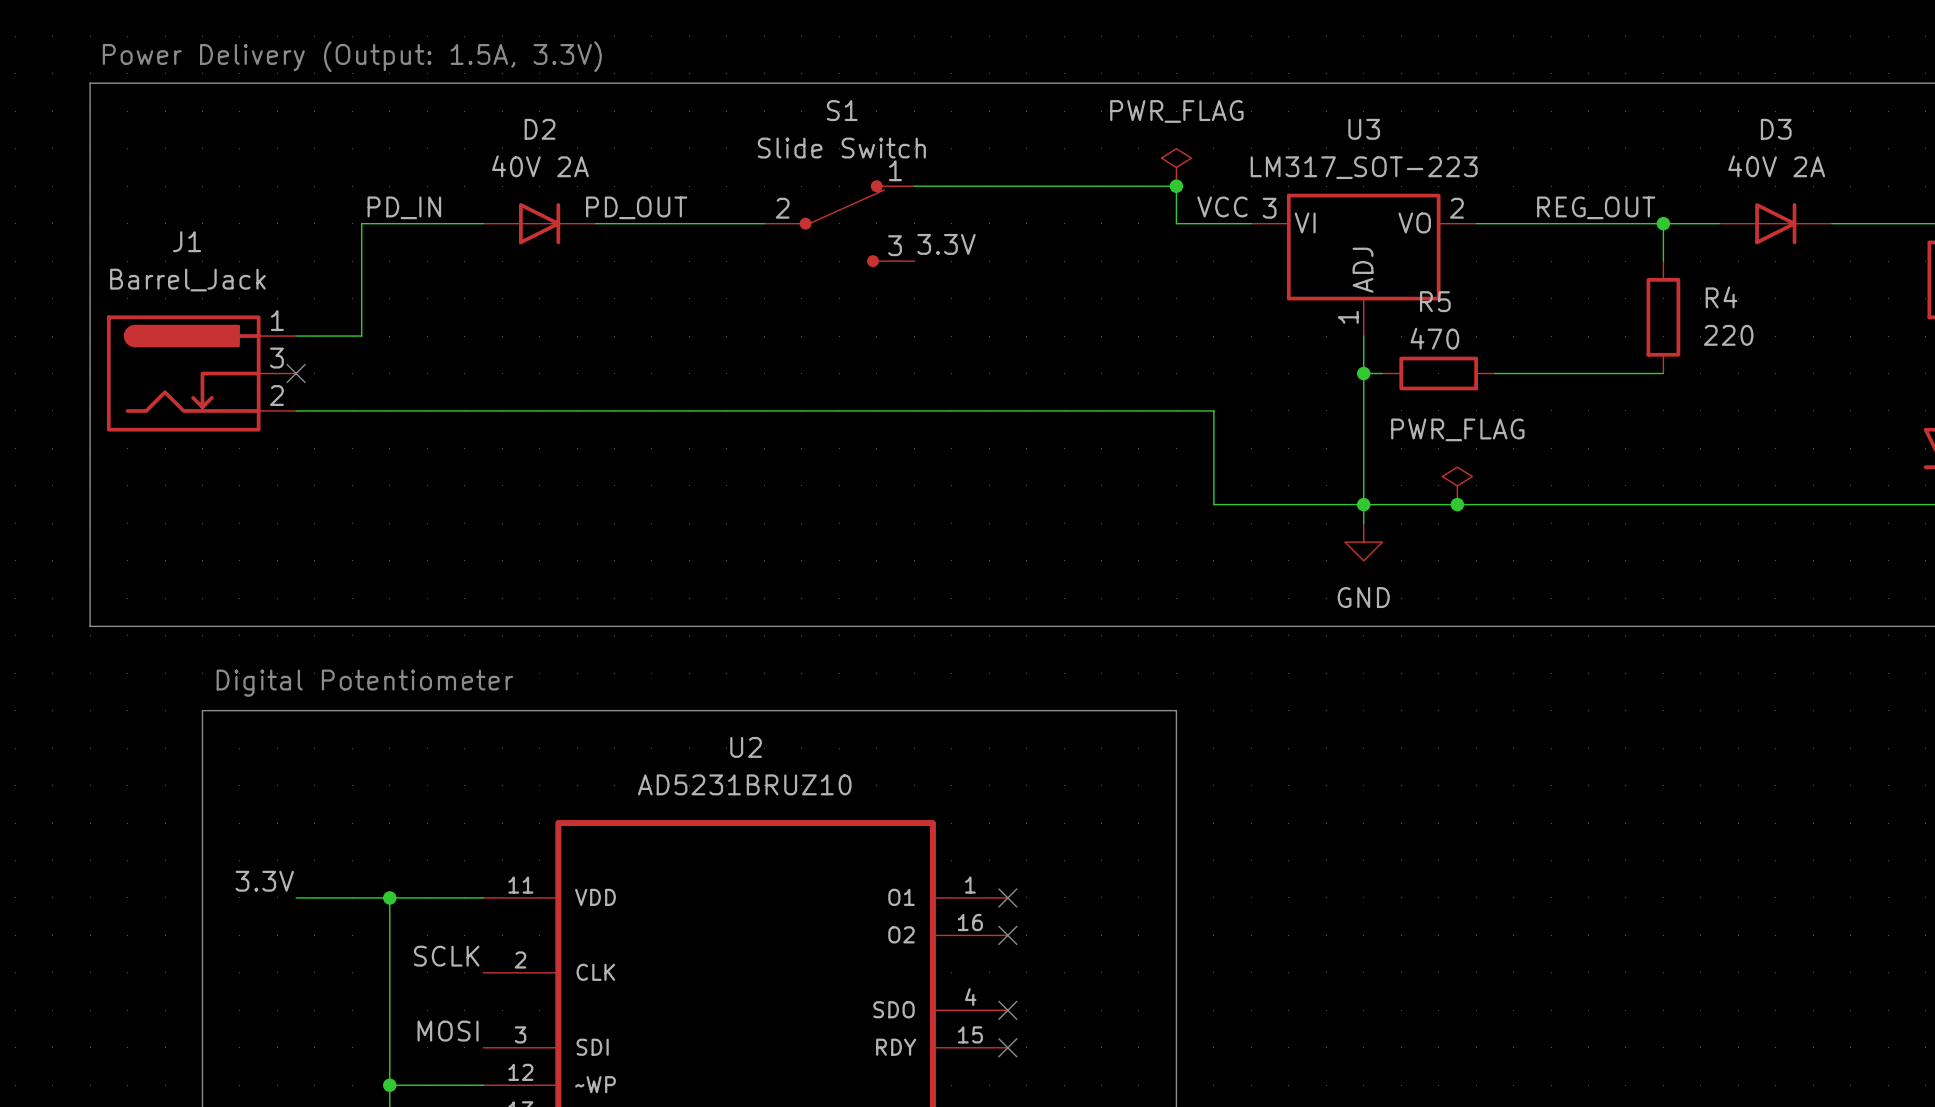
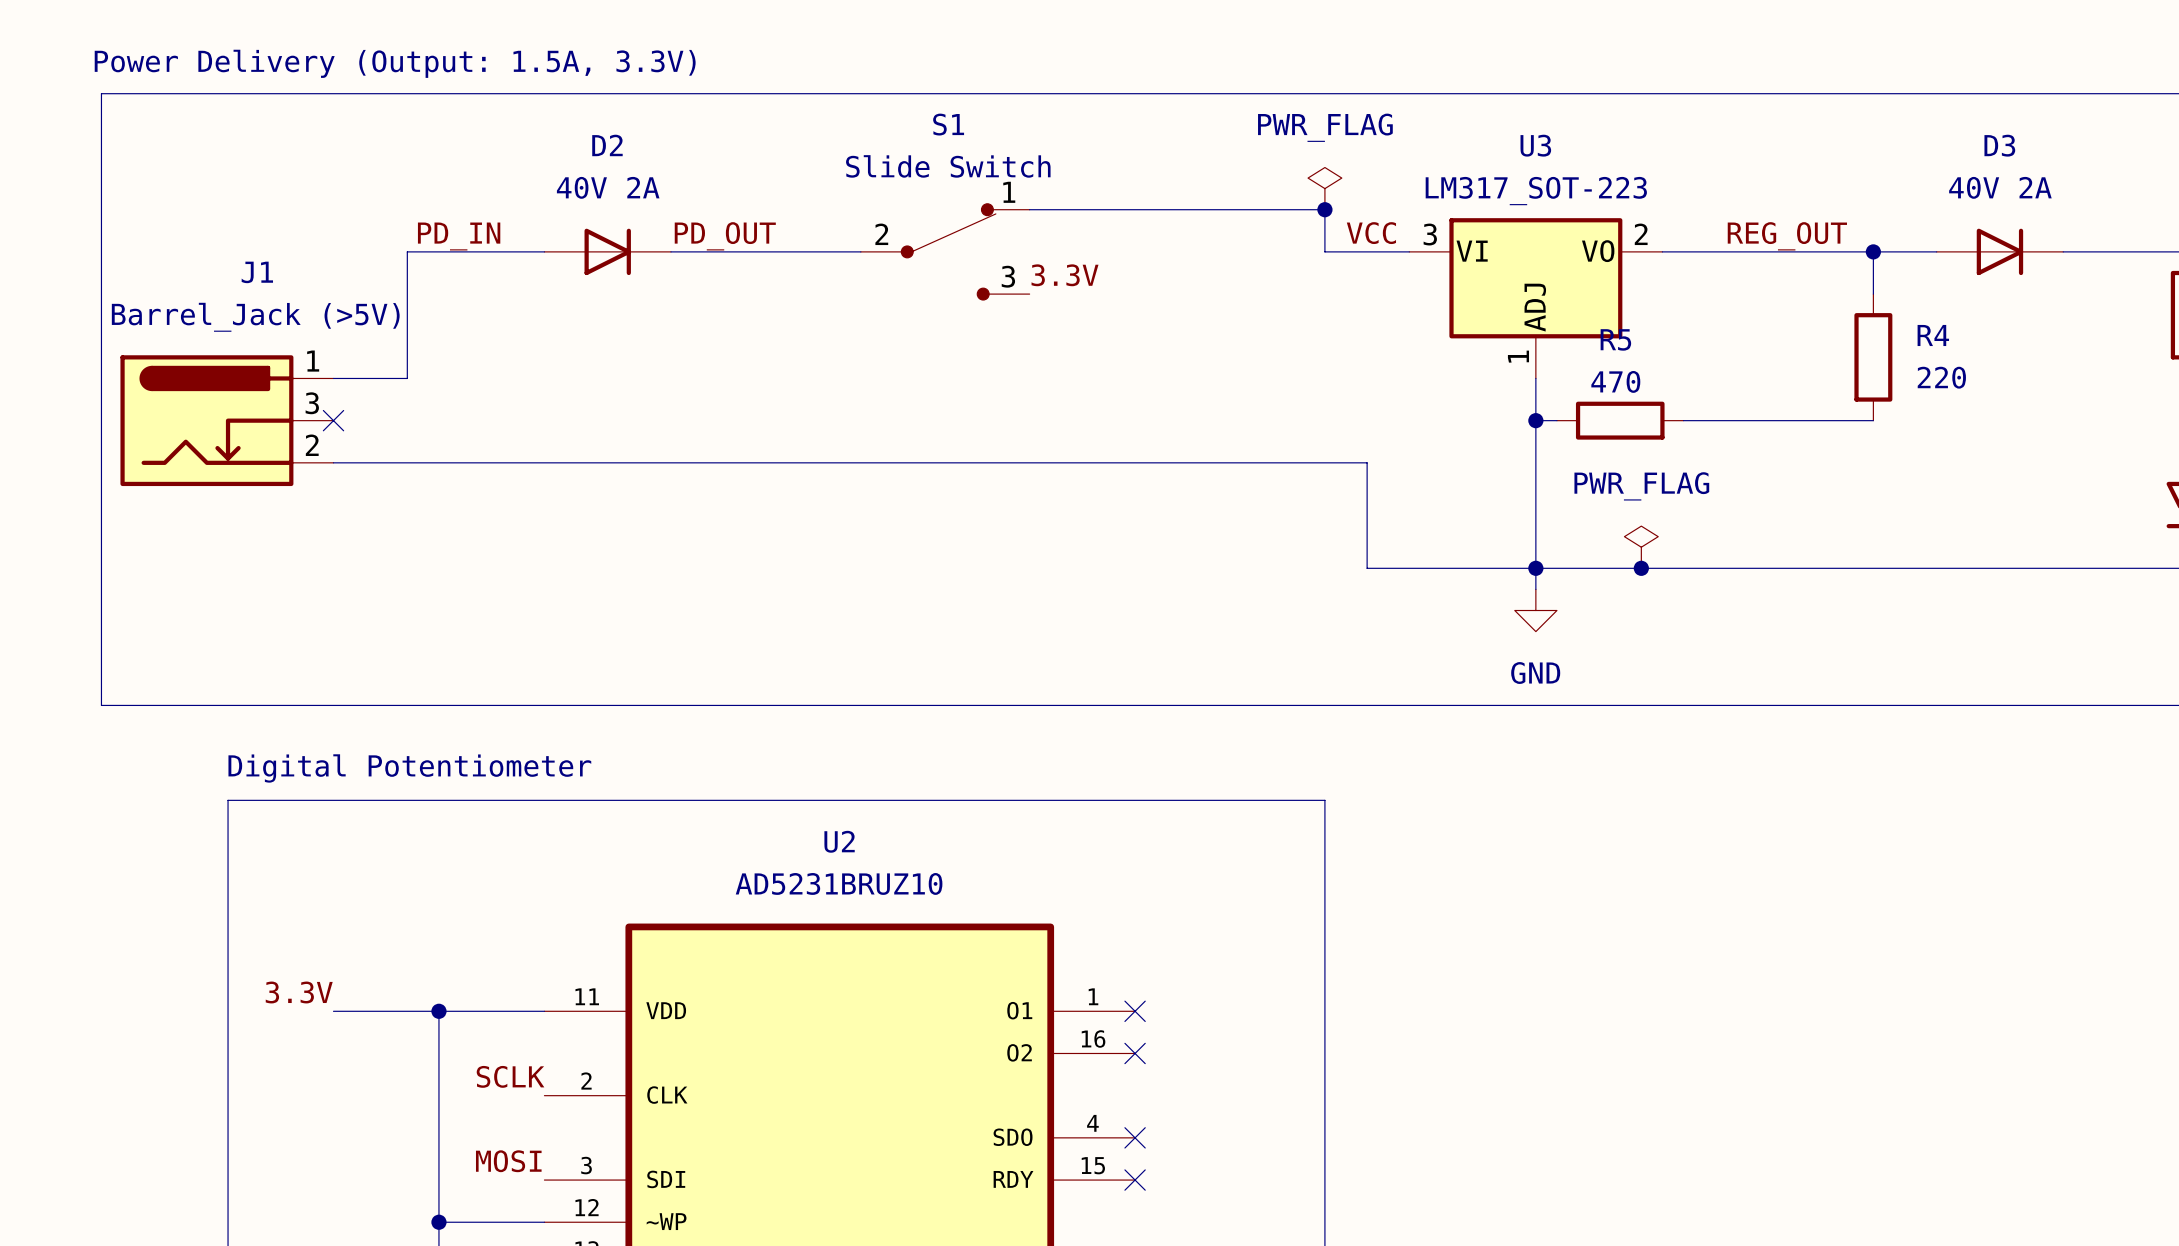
J1 name position: J1 (187, 241) -> J1 (257, 272)
J1 value: Barrel_Jack (187, 280) -> Barrel_Jack (>5V) (255, 317)

